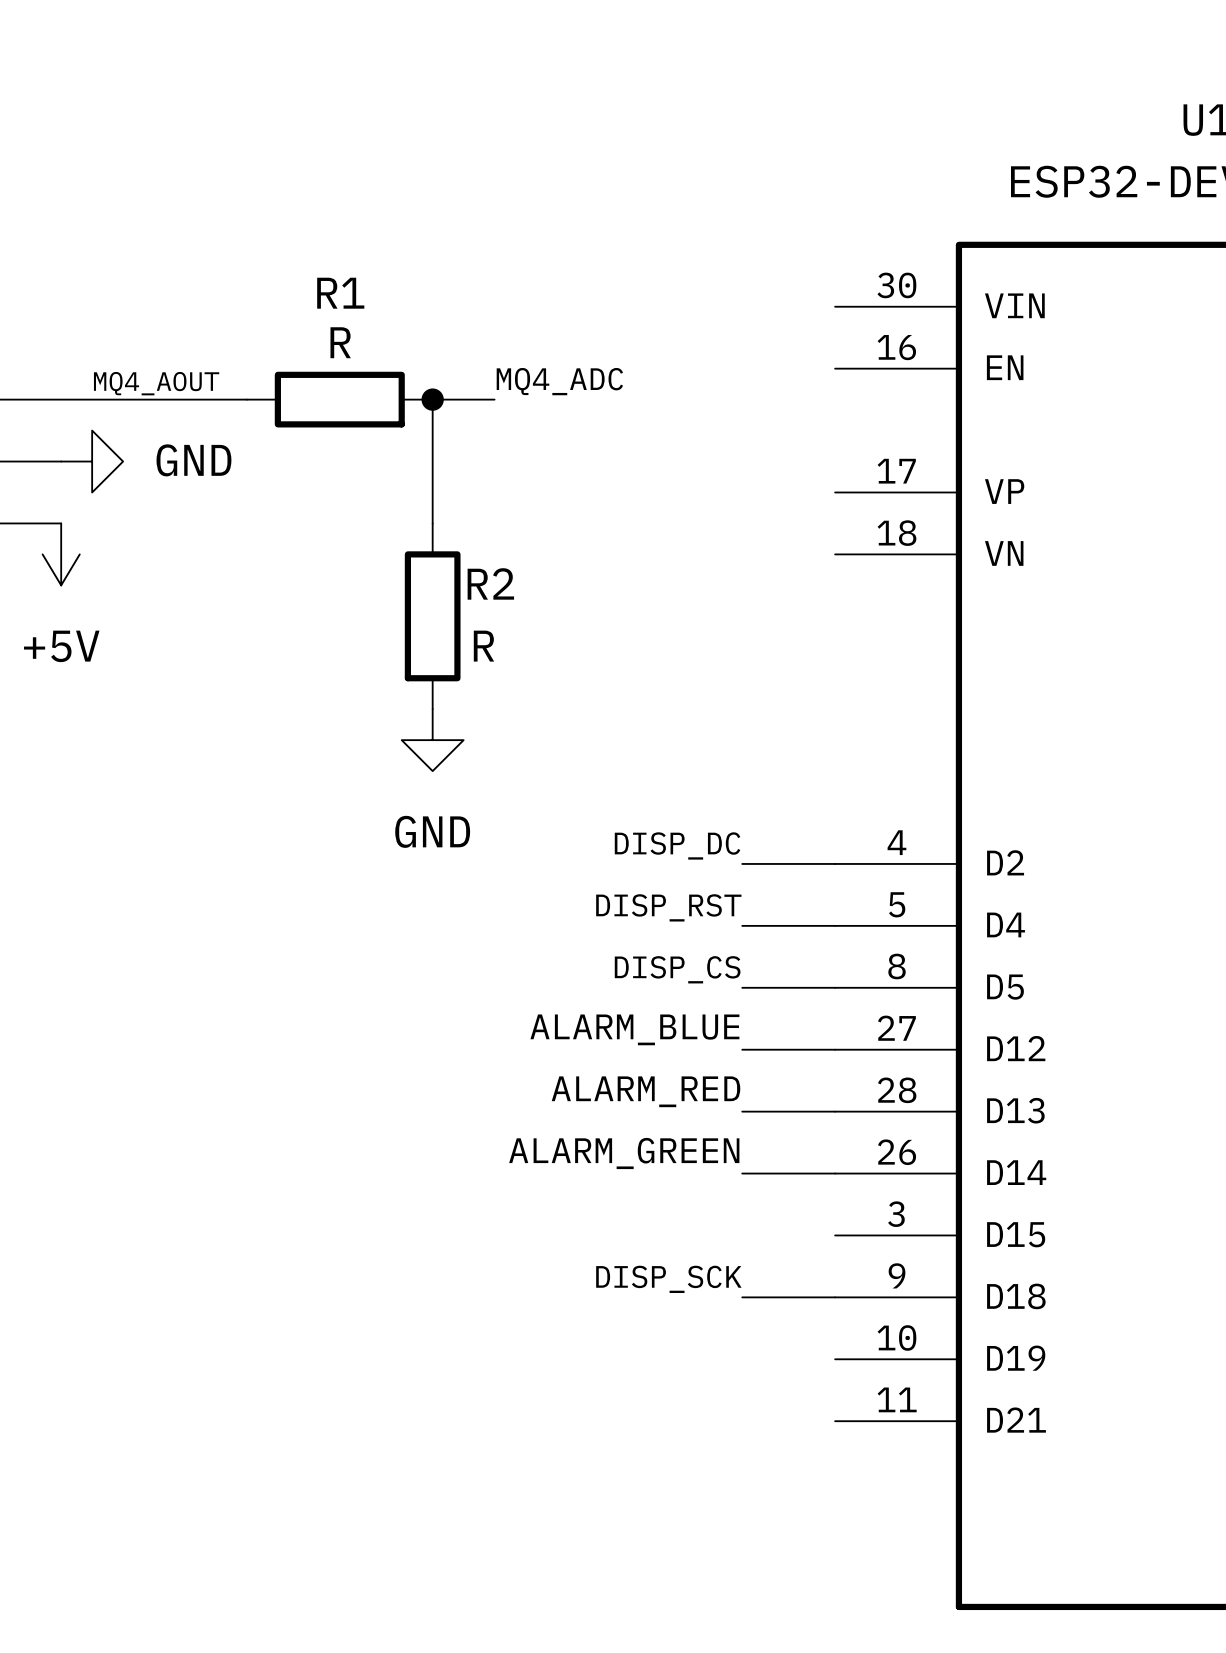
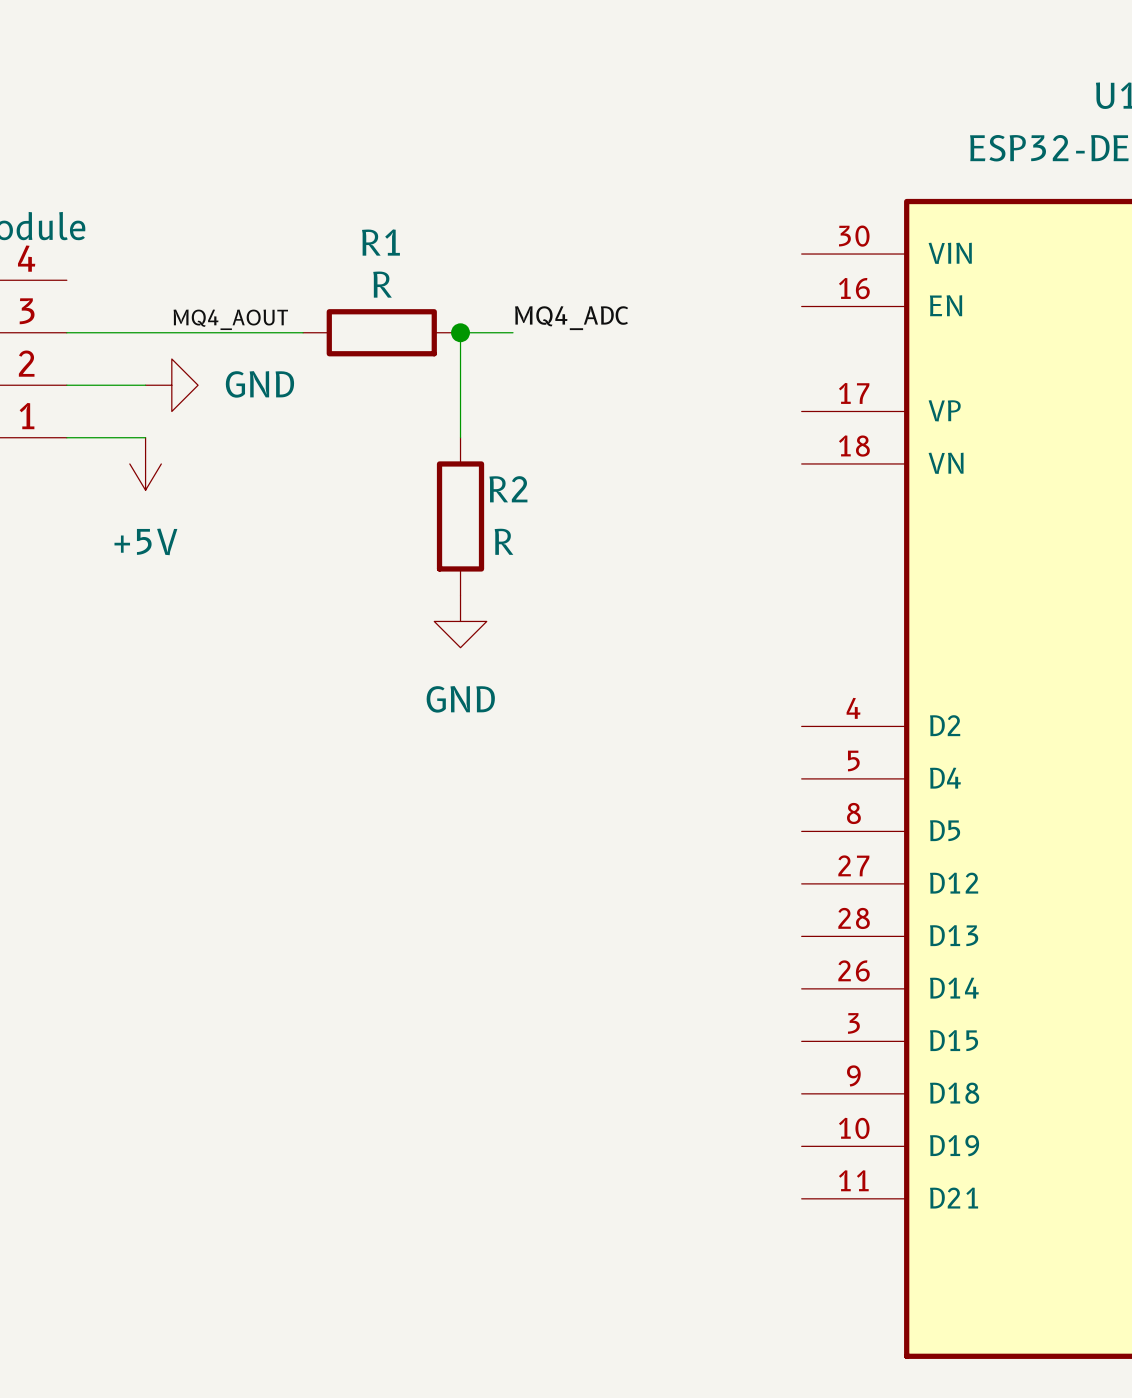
label: DISP_DC (677, 845) -> none
wire: (742, 863) (835, 863) -> none
label: DISP_RST (668, 907) -> none
wire: (742, 925) (835, 925) -> none
label: DISP_CS (677, 969) -> none
wire: (742, 987) (835, 987) -> none
label: ALARM_BLUE (634, 1029) -> none
wire: (742, 1049) (835, 1049) -> none
label: ALARM_RED (645, 1091) -> none
wire: (742, 1111) (835, 1111) -> none
label: ALARM_GREEN (624, 1153) -> none
wire: (742, 1173) (835, 1173) -> none
label: DISP_SCK (668, 1279) -> none
wire: (742, 1297) (835, 1297) -> none

